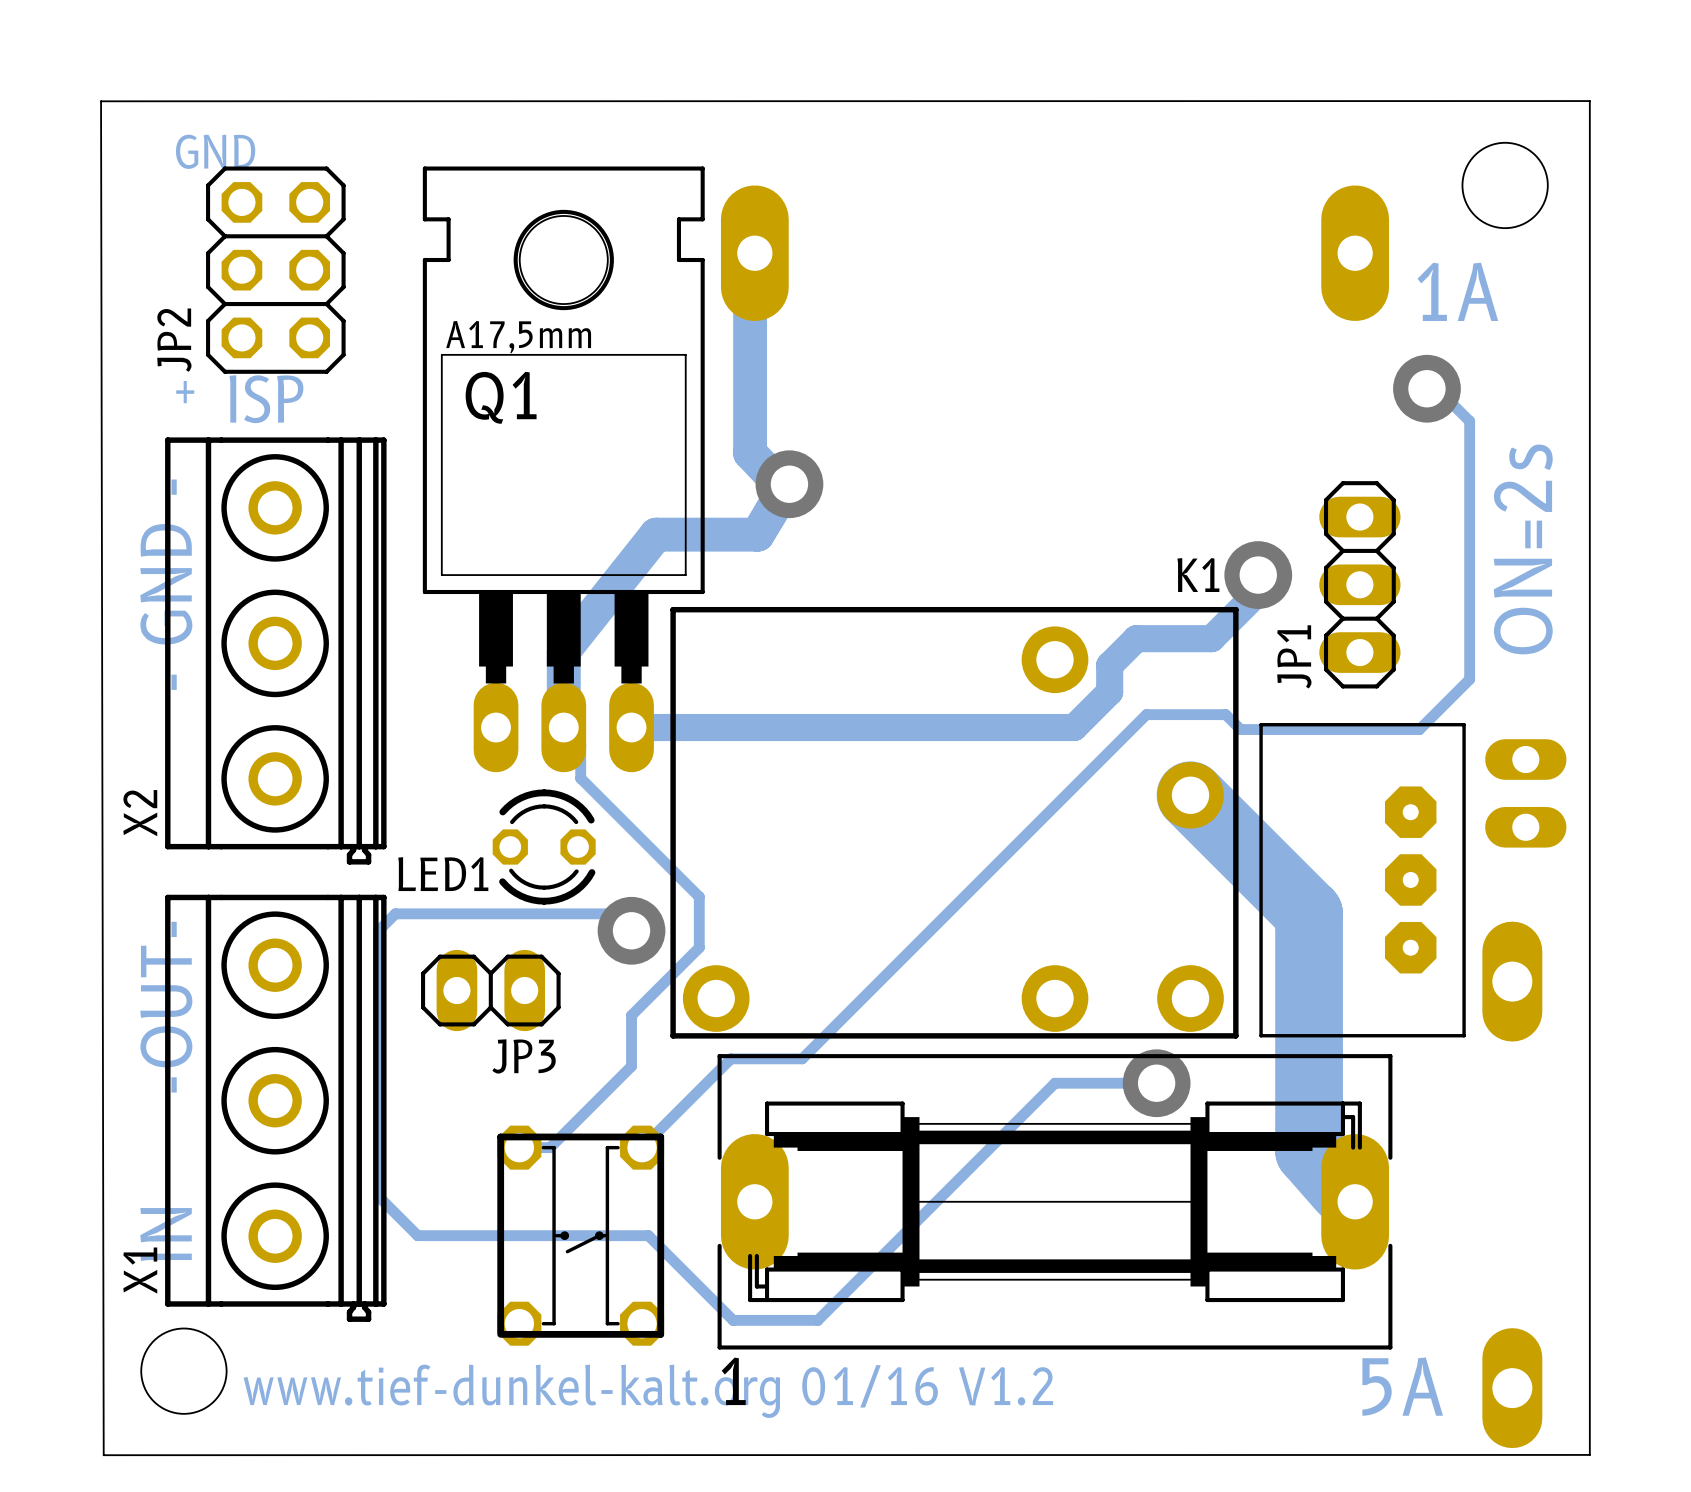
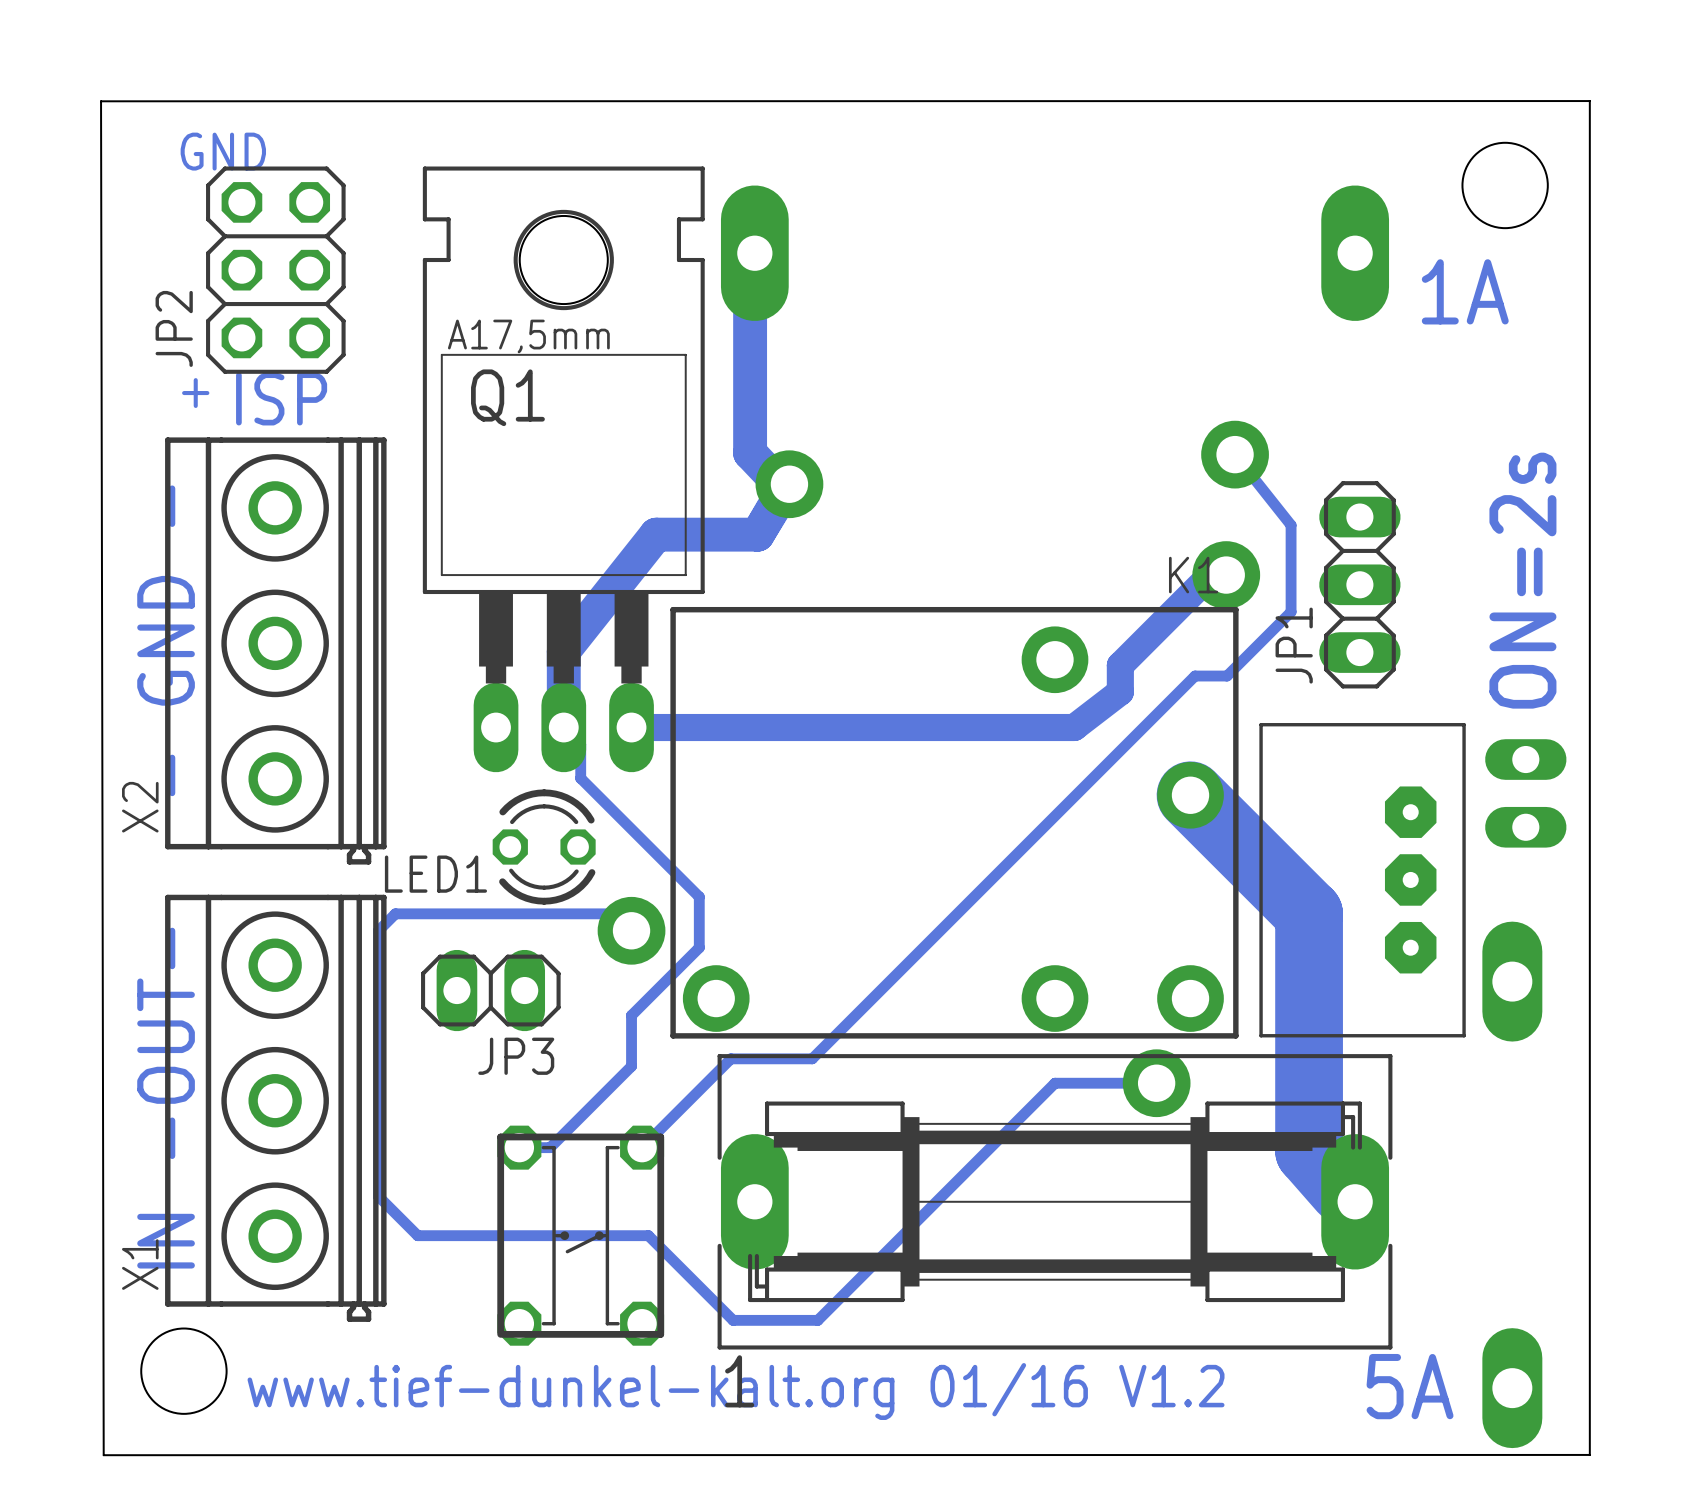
track: (1426, 388) (1437, 388) (1469, 421) (1469, 679) (1419, 729) (1240, 729) (1225, 714) (1146, 714) (802, 1058) -> (1235, 454) (1291, 525) (1291, 612) (1227, 676) (1195, 676) (812, 1058) (802, 1058)
via: (1426, 388) -> none
via: none -> (1235, 454)
track: (1258, 575) (1258, 592) (1211, 638) (1136, 638) (1109, 665) (1109, 692) (1074, 727) -> (1226, 575) (1226, 581) (1243, 574) (1211, 574) (1120, 665) (1120, 692) (1074, 727)
via position: (1258, 575) -> (1226, 575)

